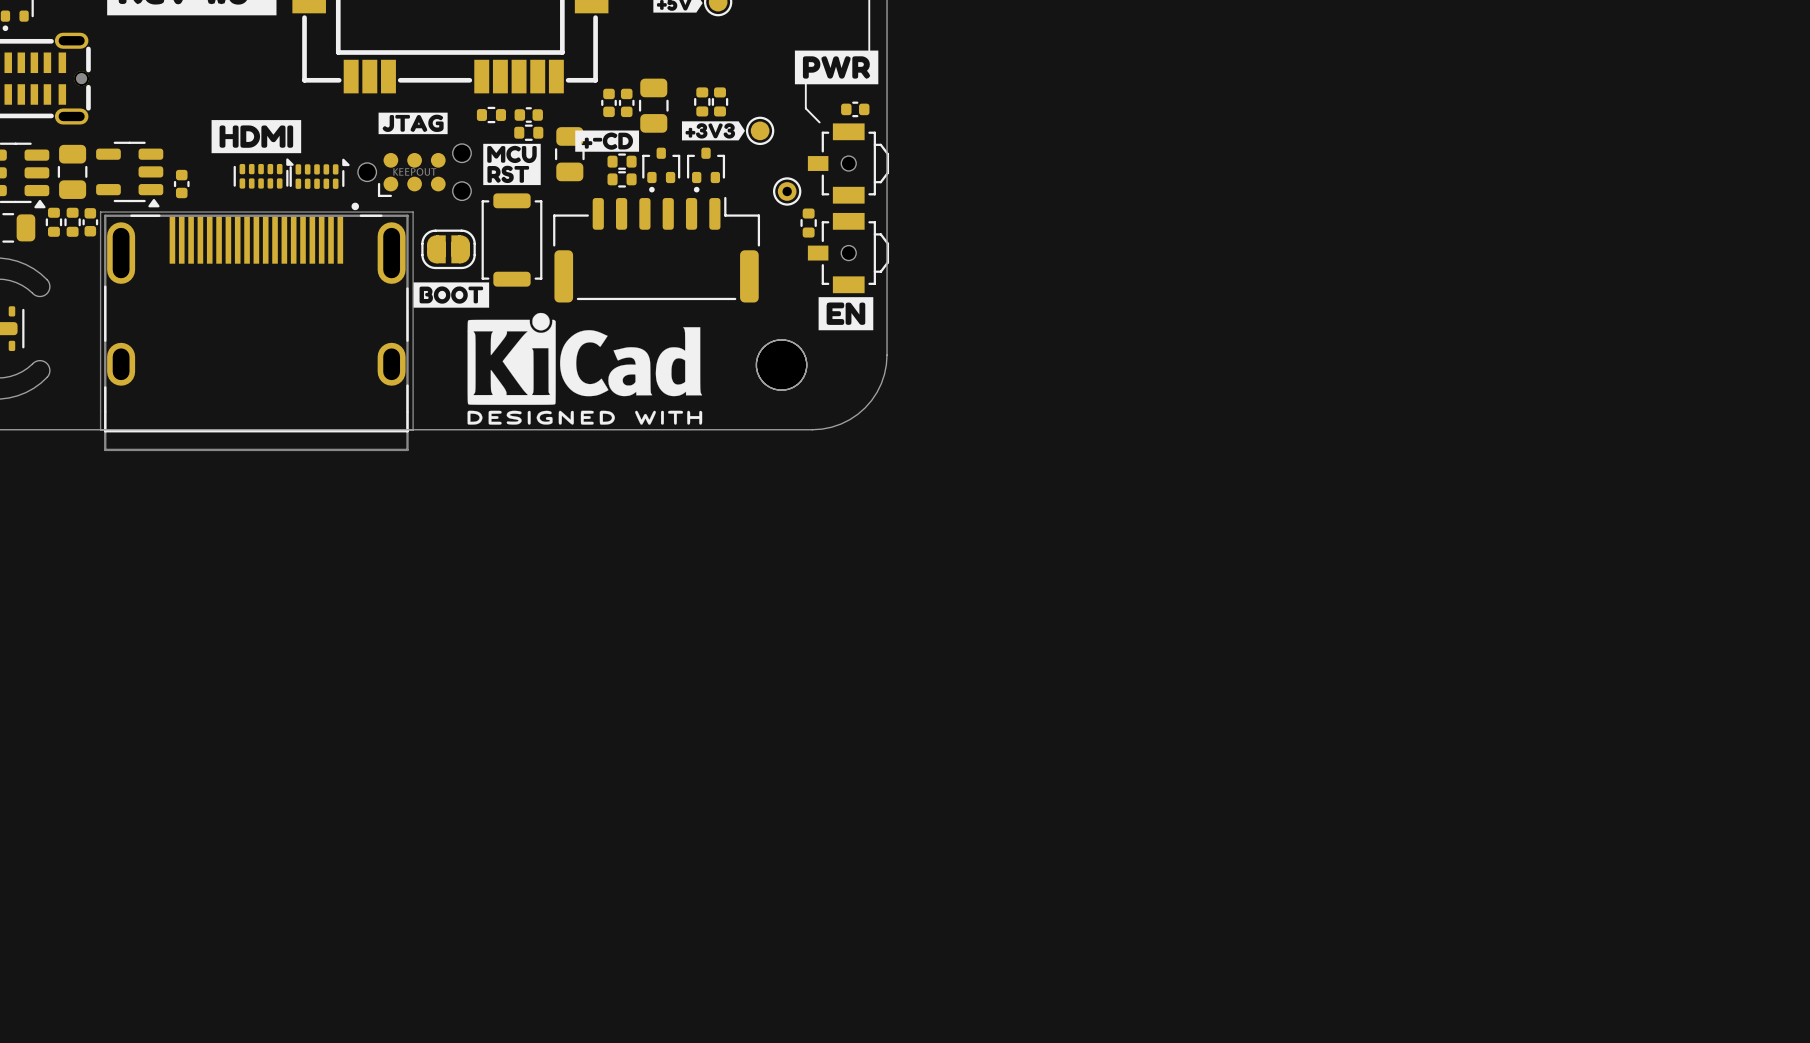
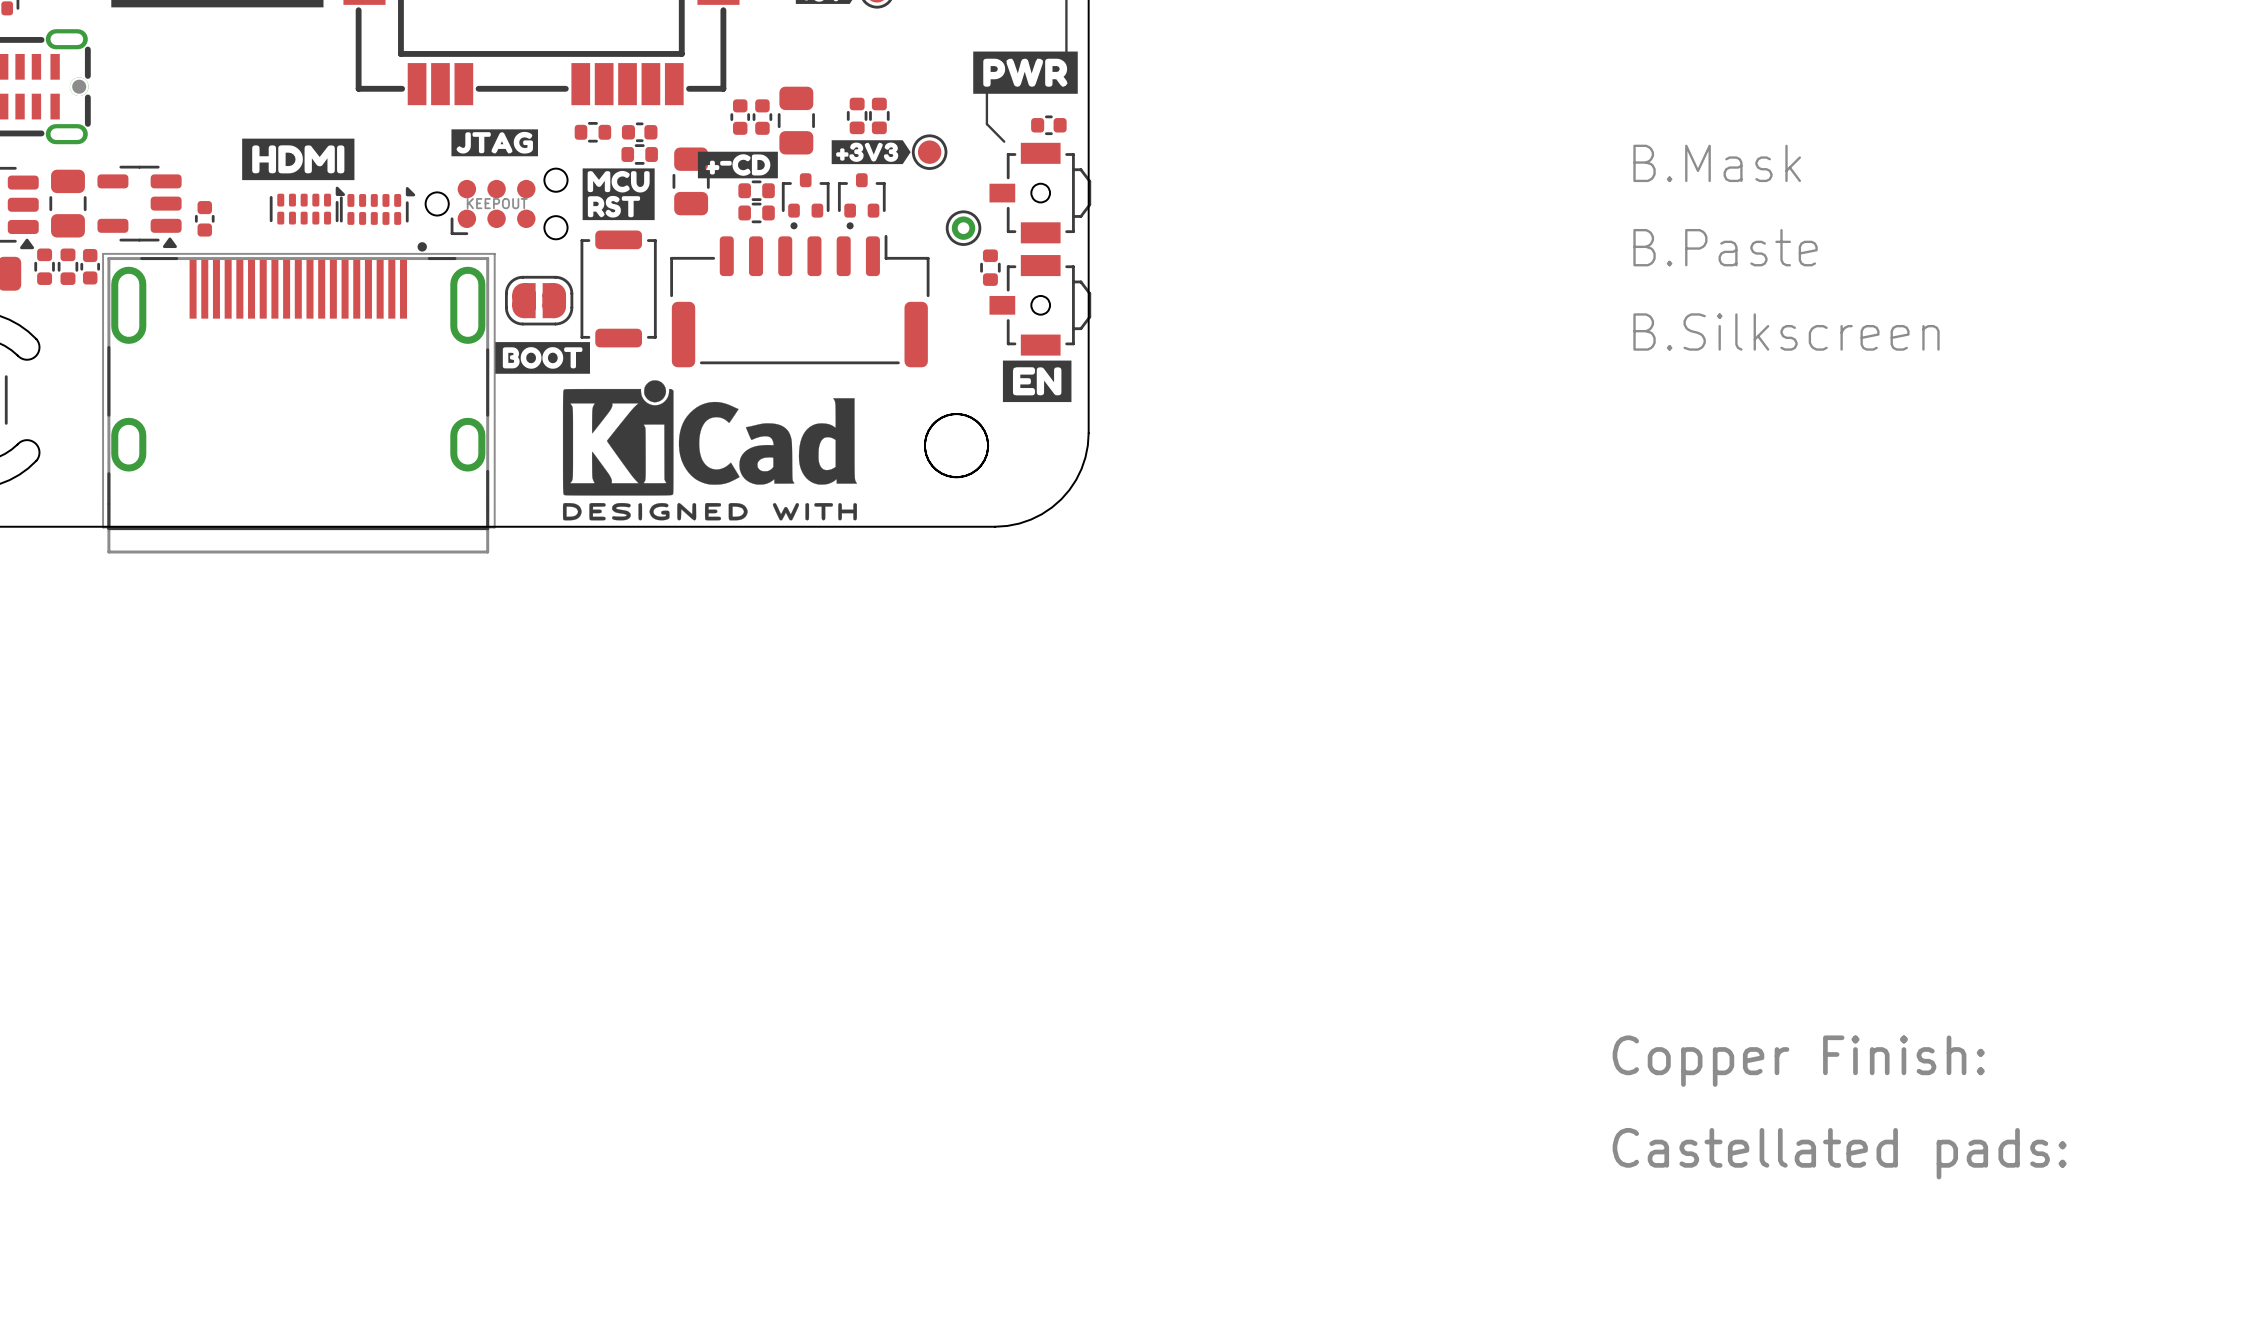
text: none -> B.Mask (1717, 163)
text: none -> B.Paste (1725, 247)
text: none -> B.Silkscreen (1786, 332)
text: none -> Copper Finish: (1798, 1061)
text: none -> Castellated pads: (1839, 1153)

